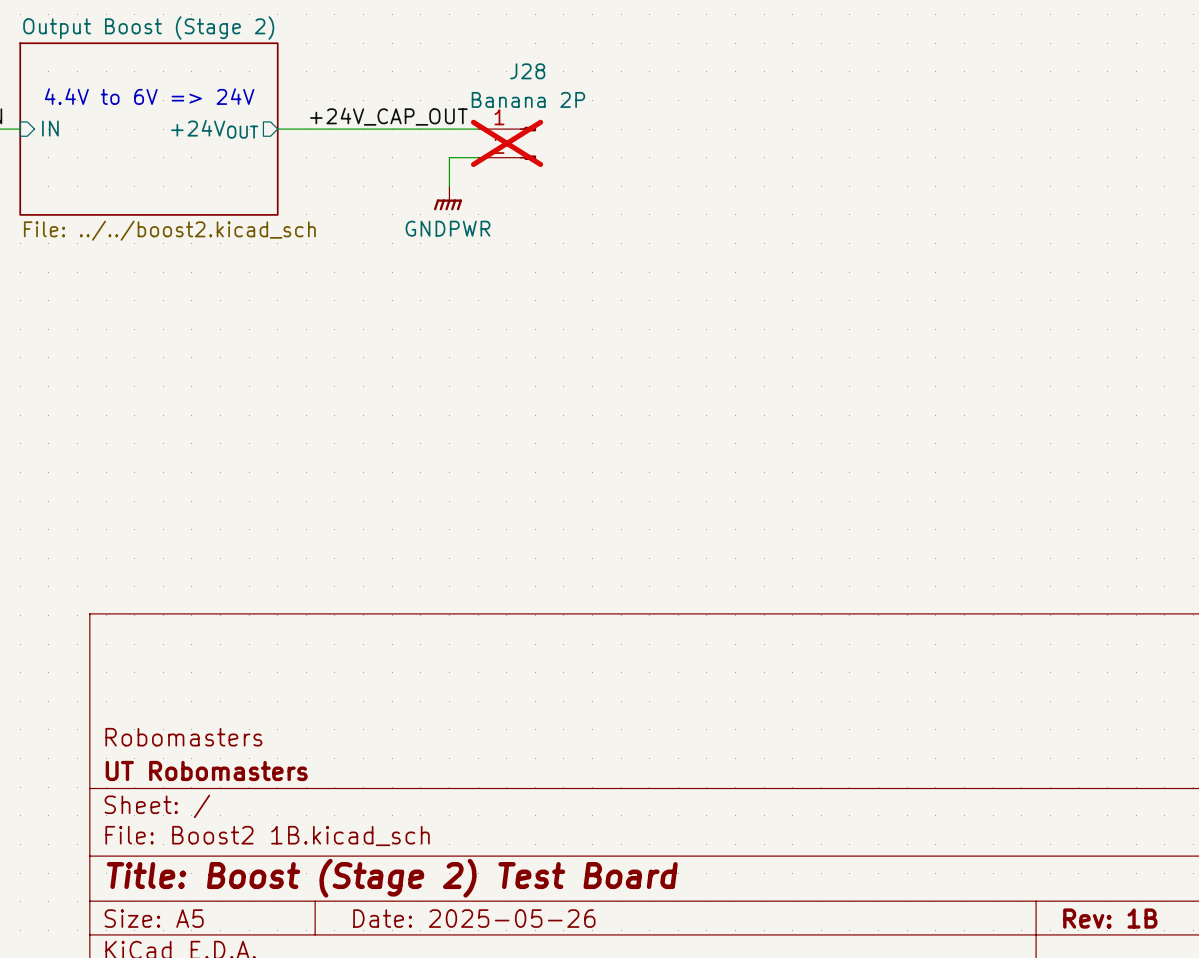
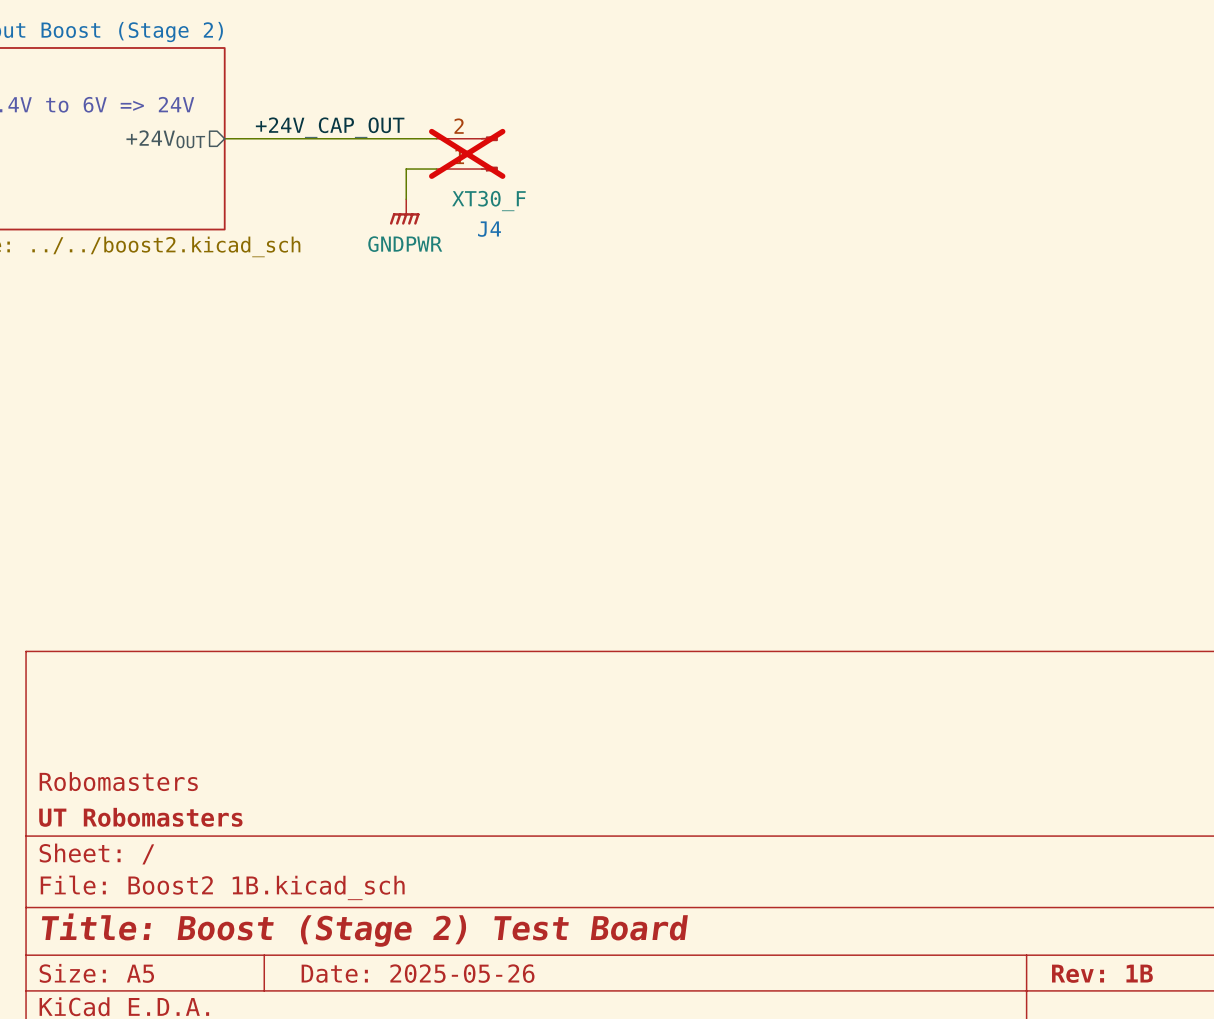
J28 name: J28 (527, 71) -> J4 (489, 229)
J28 value: Banana 2P (528, 99) -> XT30_F (488, 201)
J28 flip: as is (528, 143) -> up-down (489, 153)

